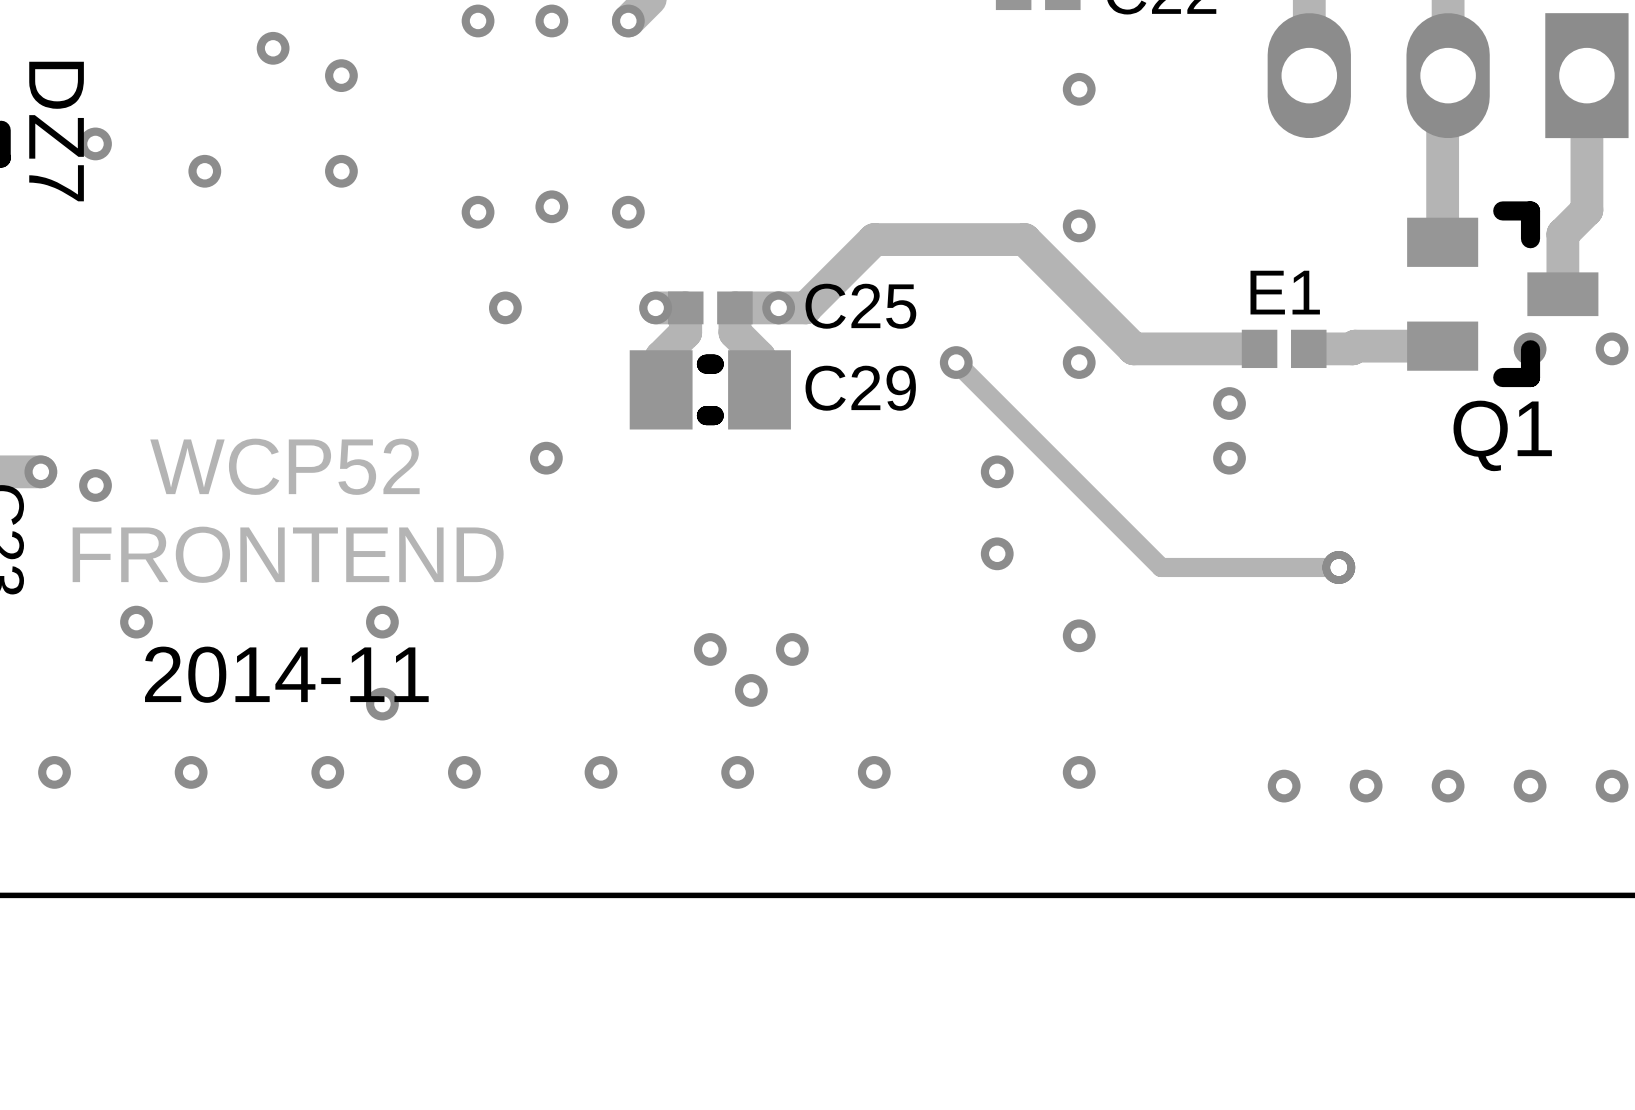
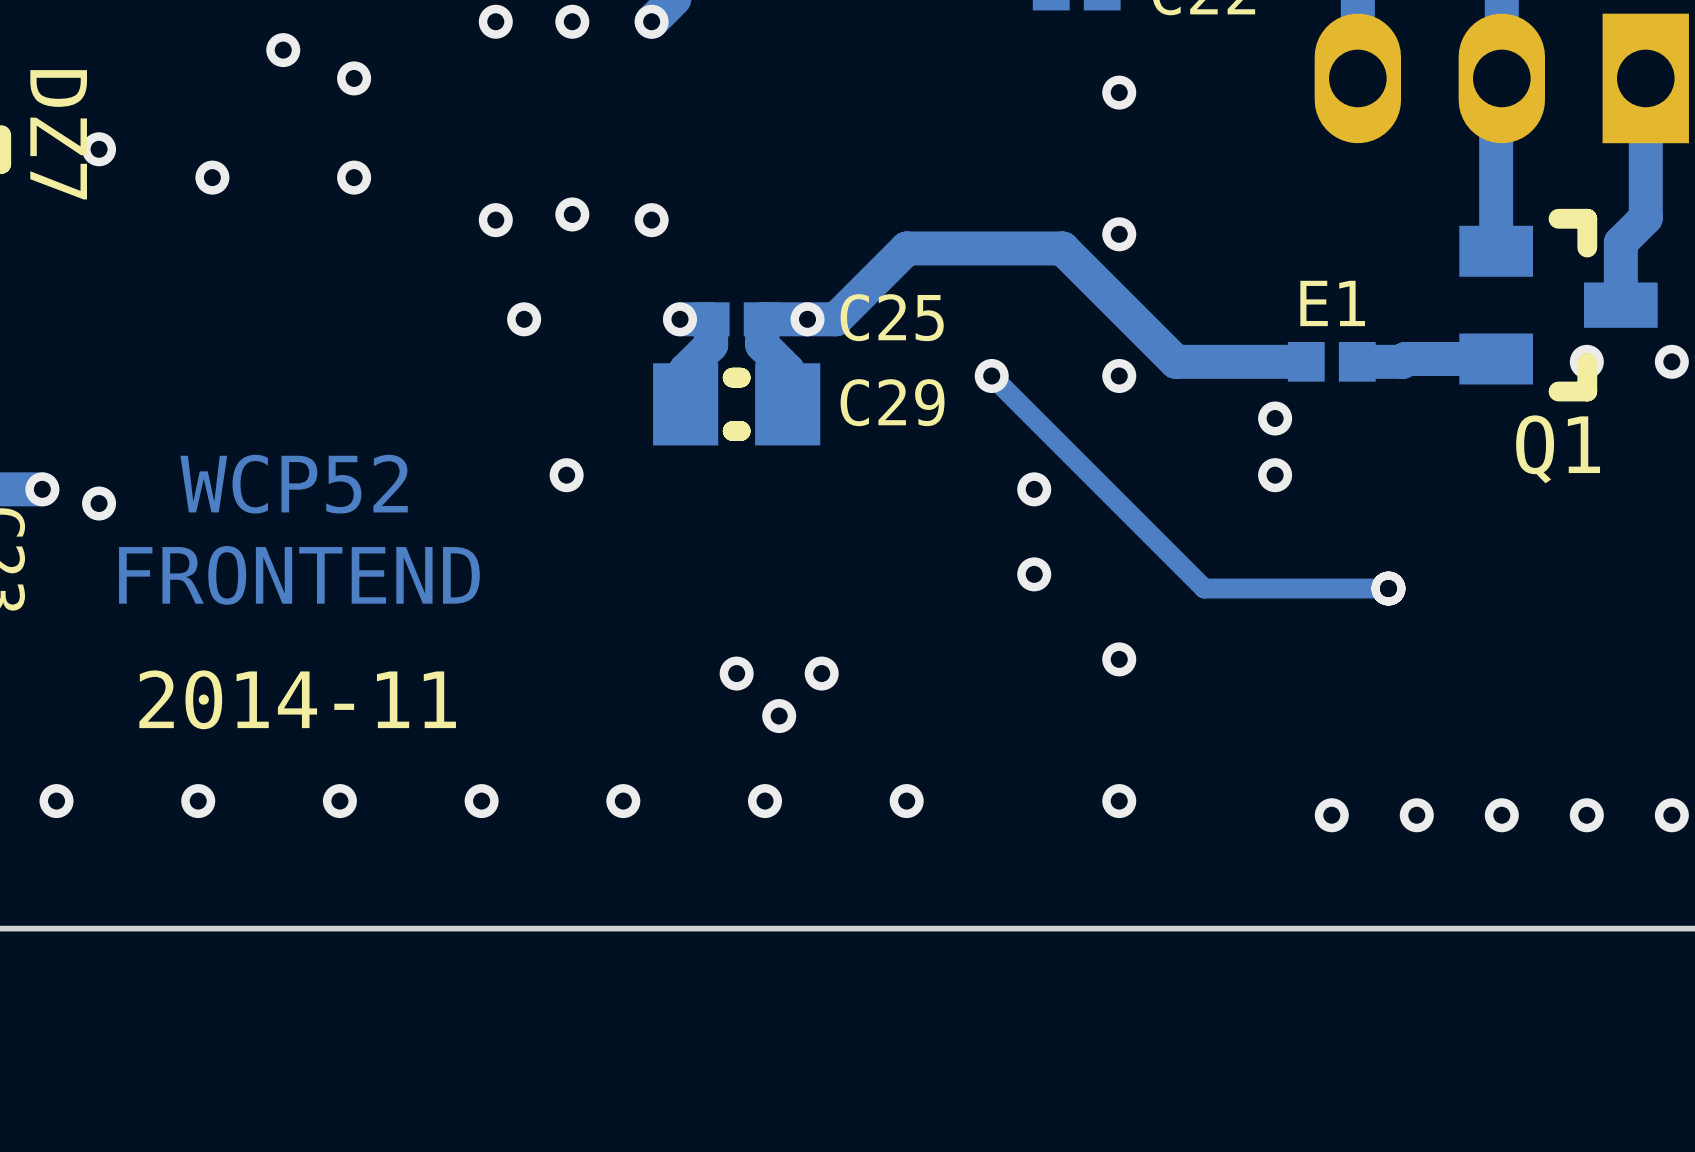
via: (136, 622) -> none
via: (382, 622) -> none
via: (382, 704) -> none

